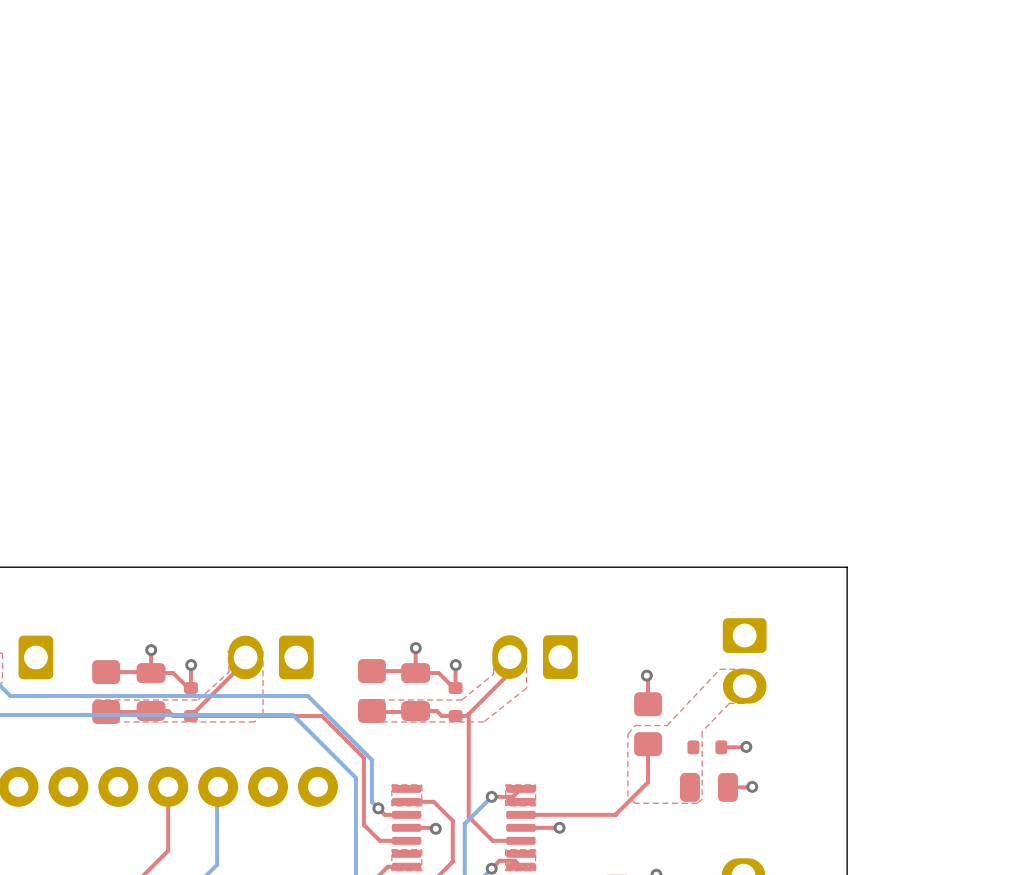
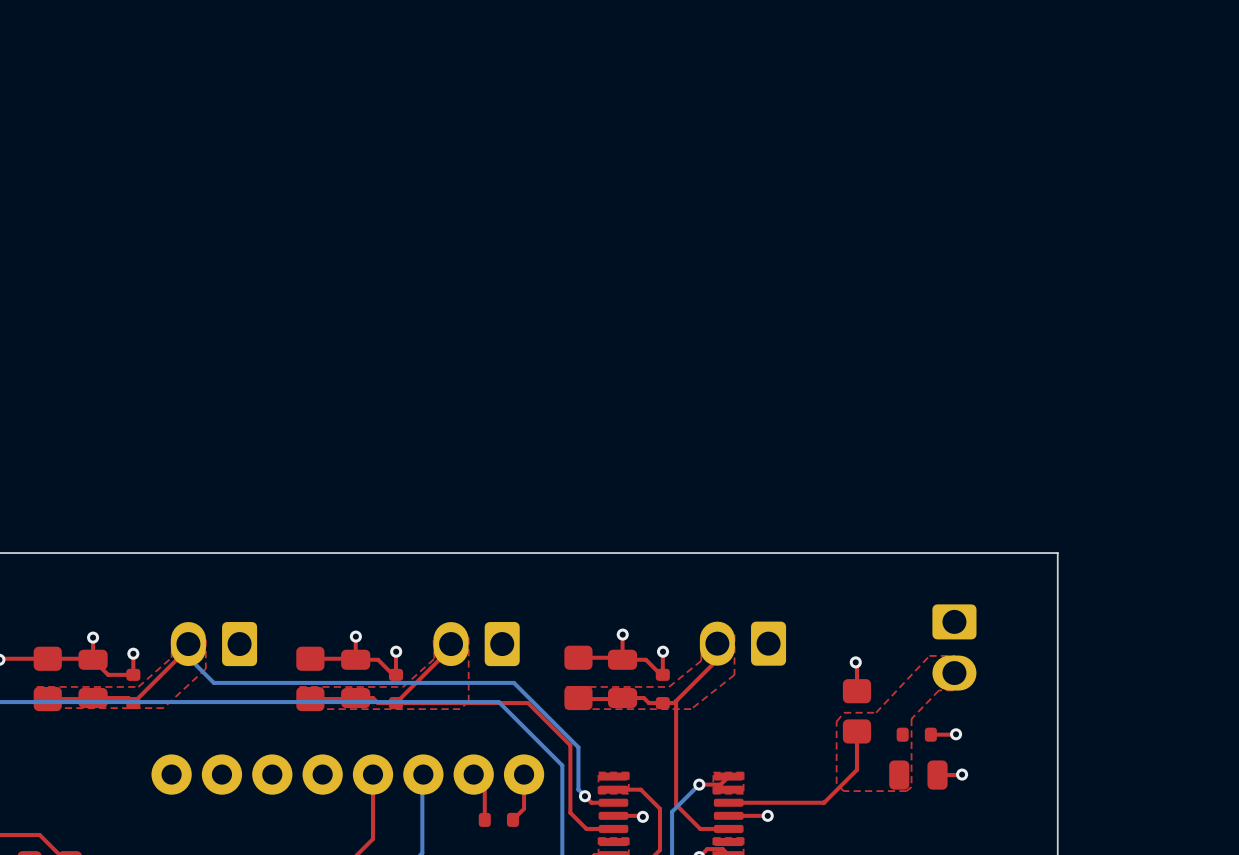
top track: none -> (473, 774) (484, 785) (484, 819)
top track: none -> (524, 774) (524, 808) (512, 819)
part: none -> (498, 819)

